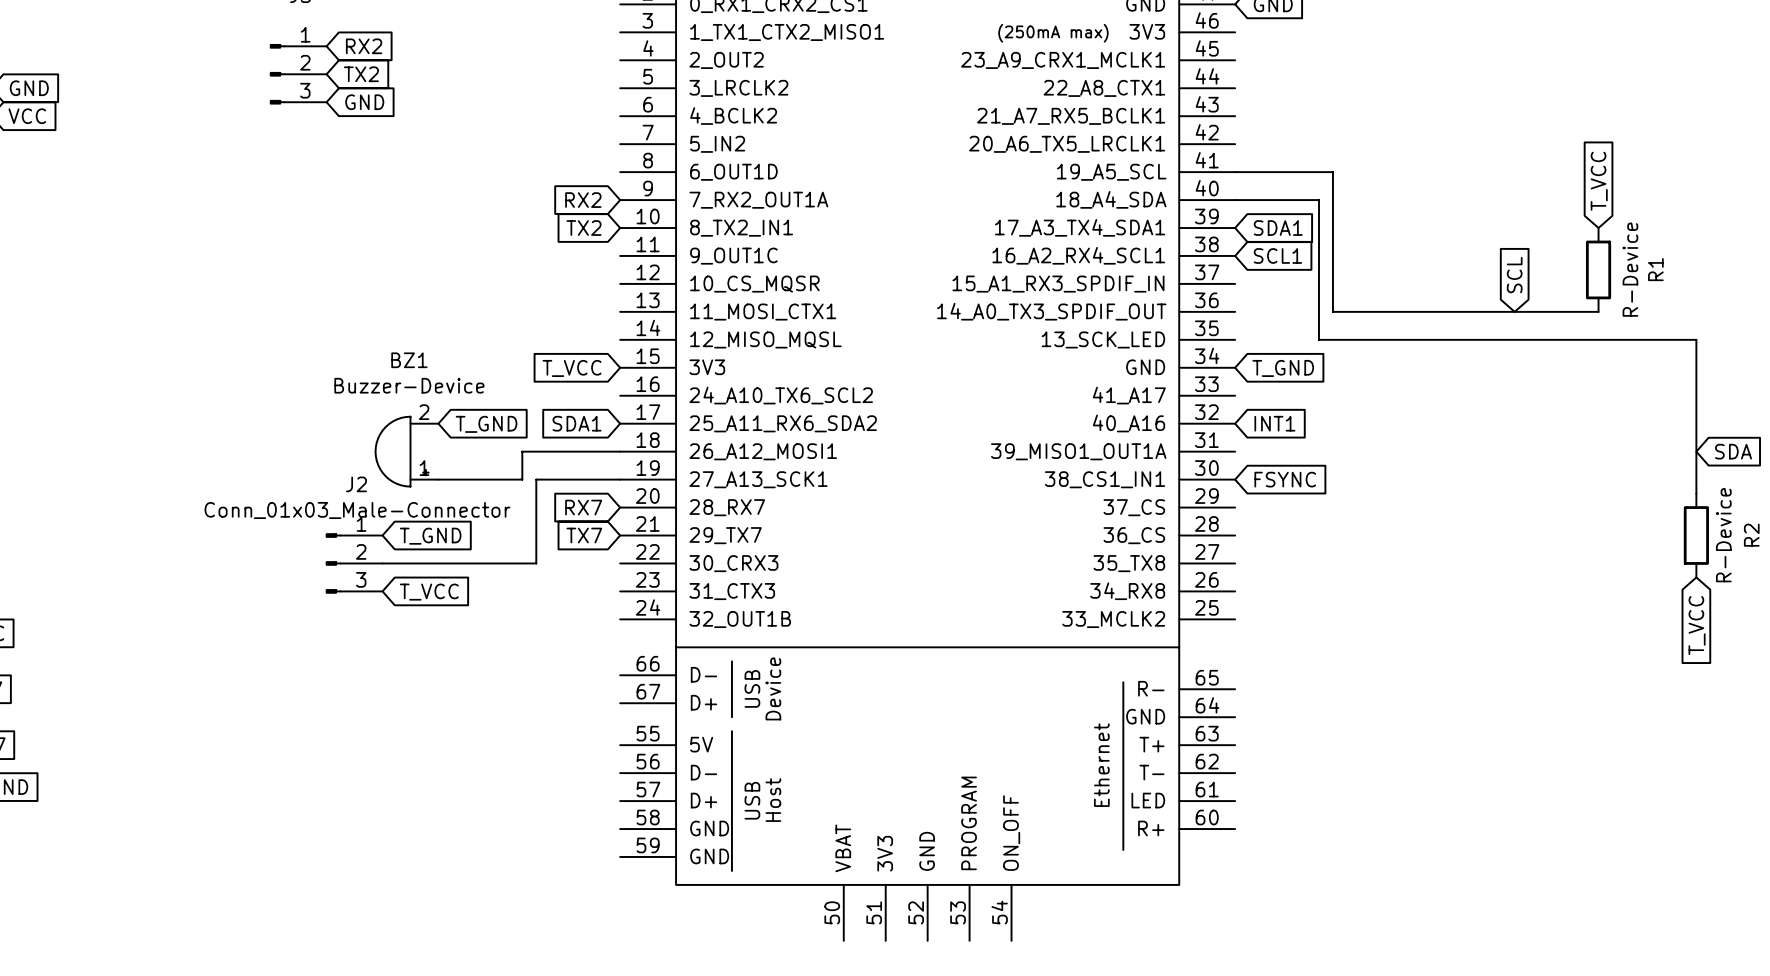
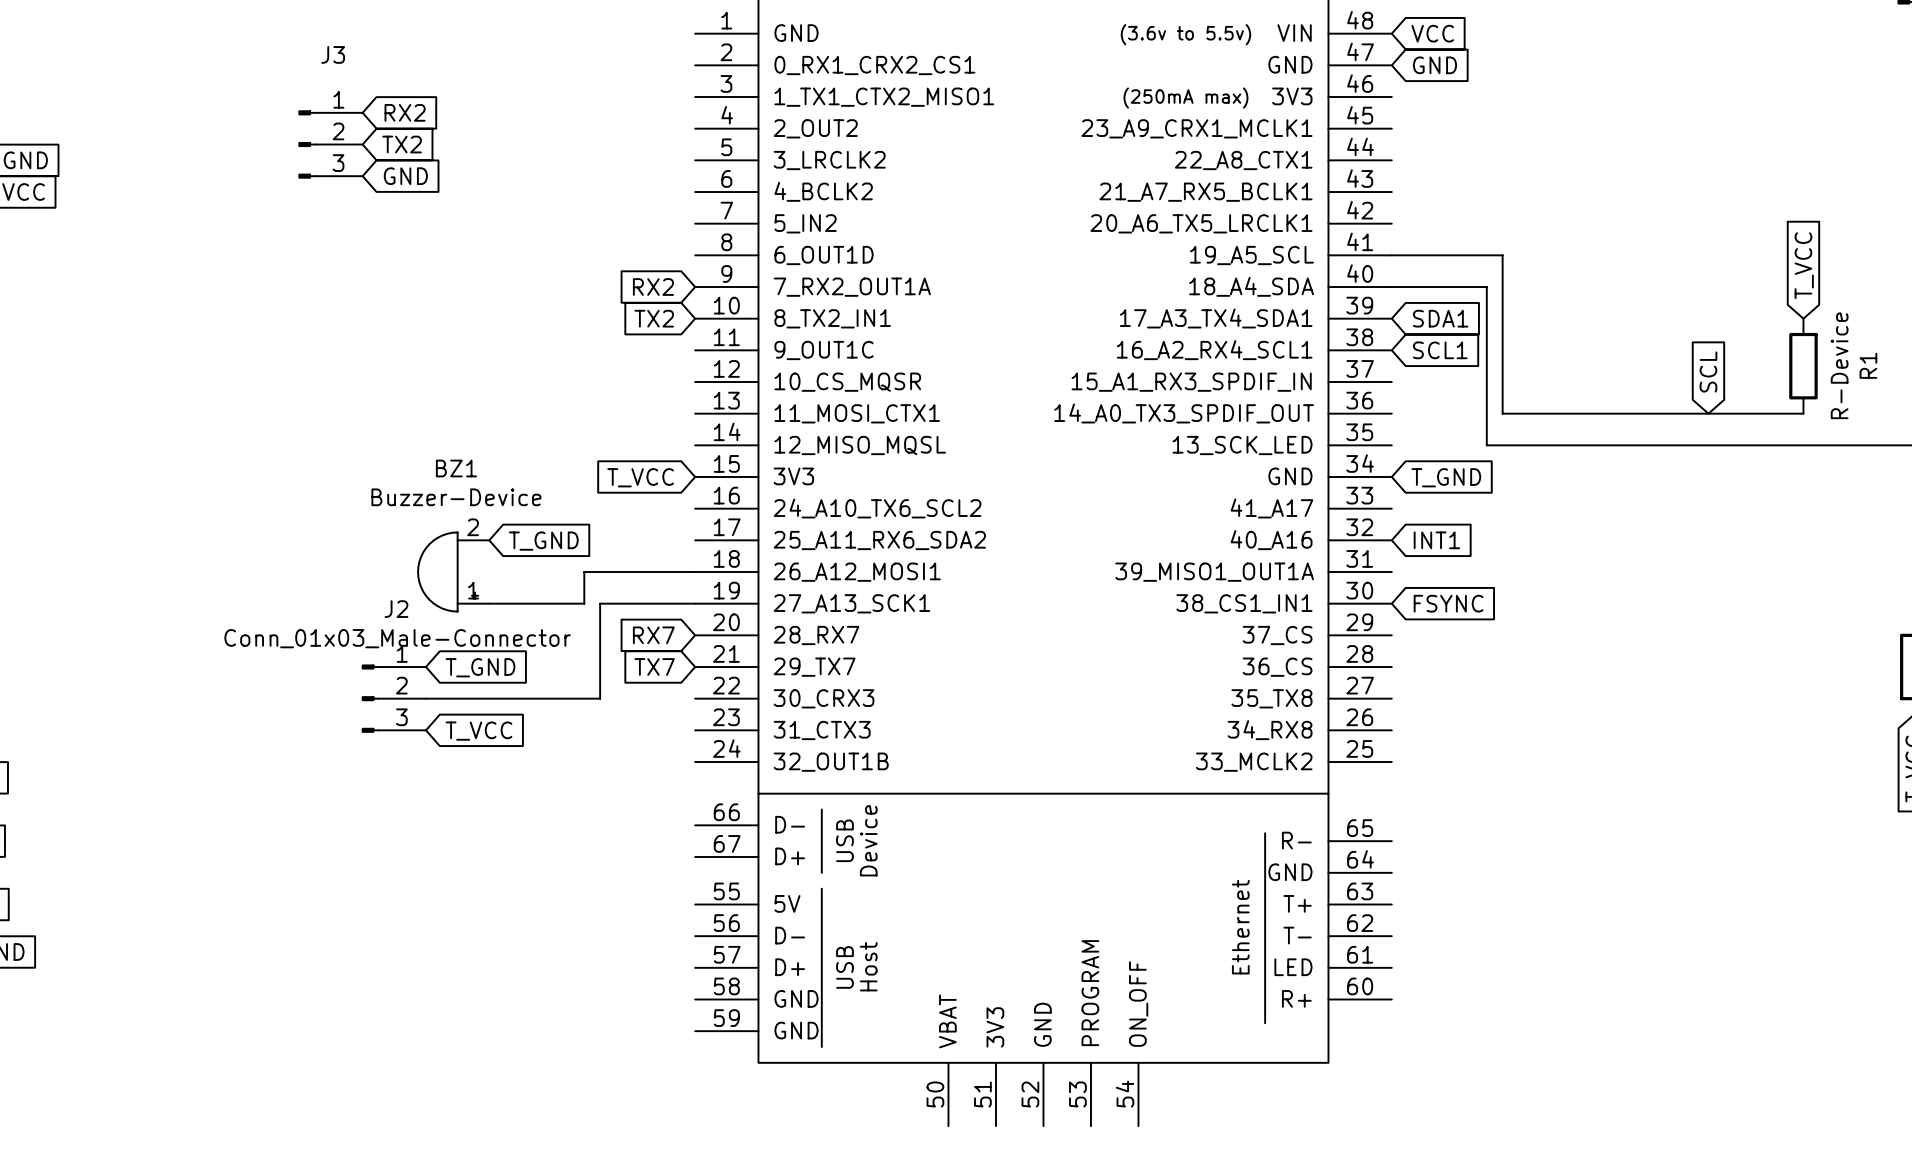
global label: SDA1 (577, 423) -> none

